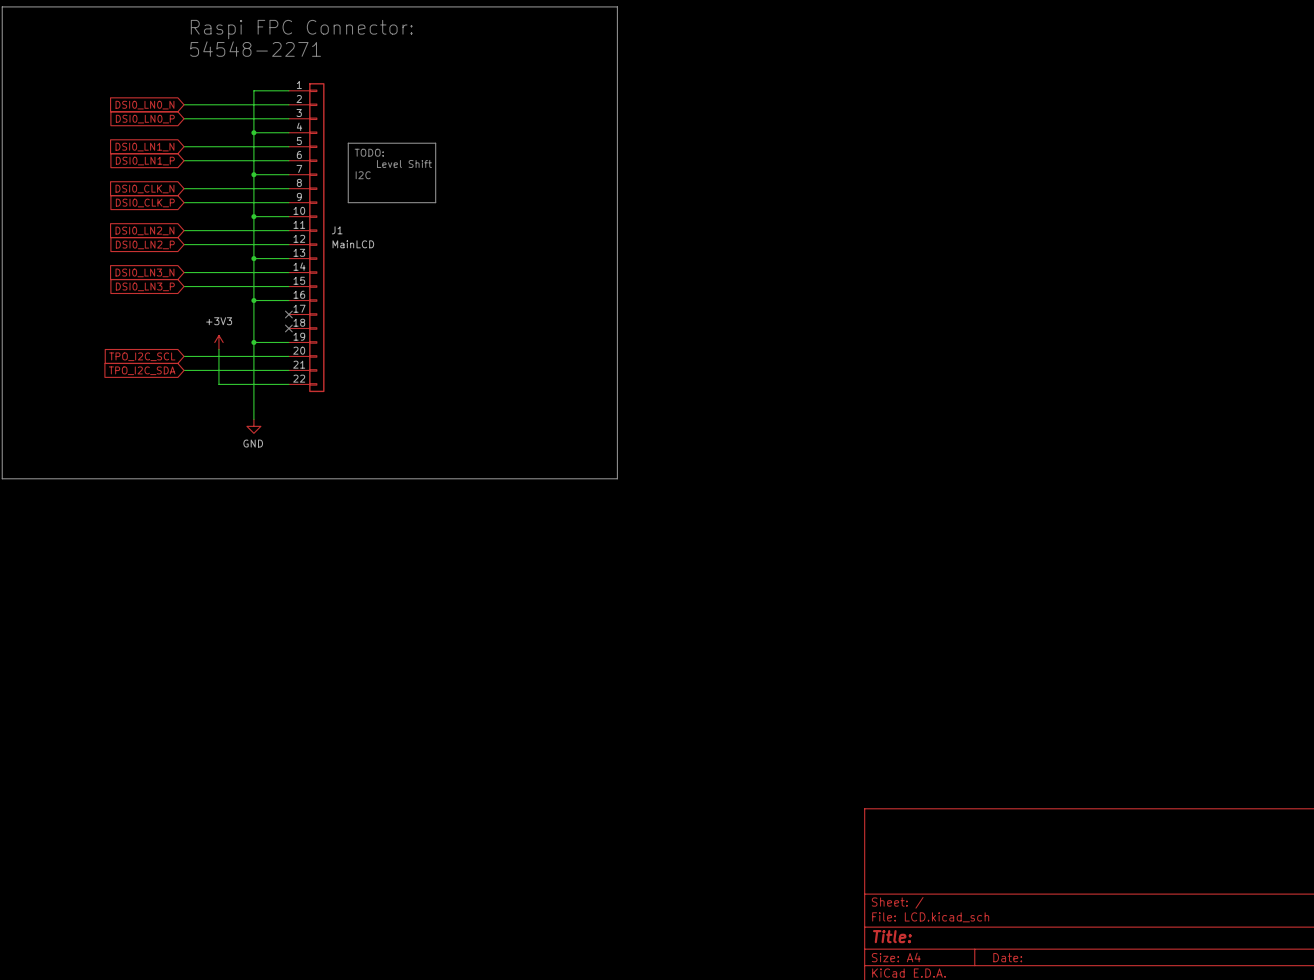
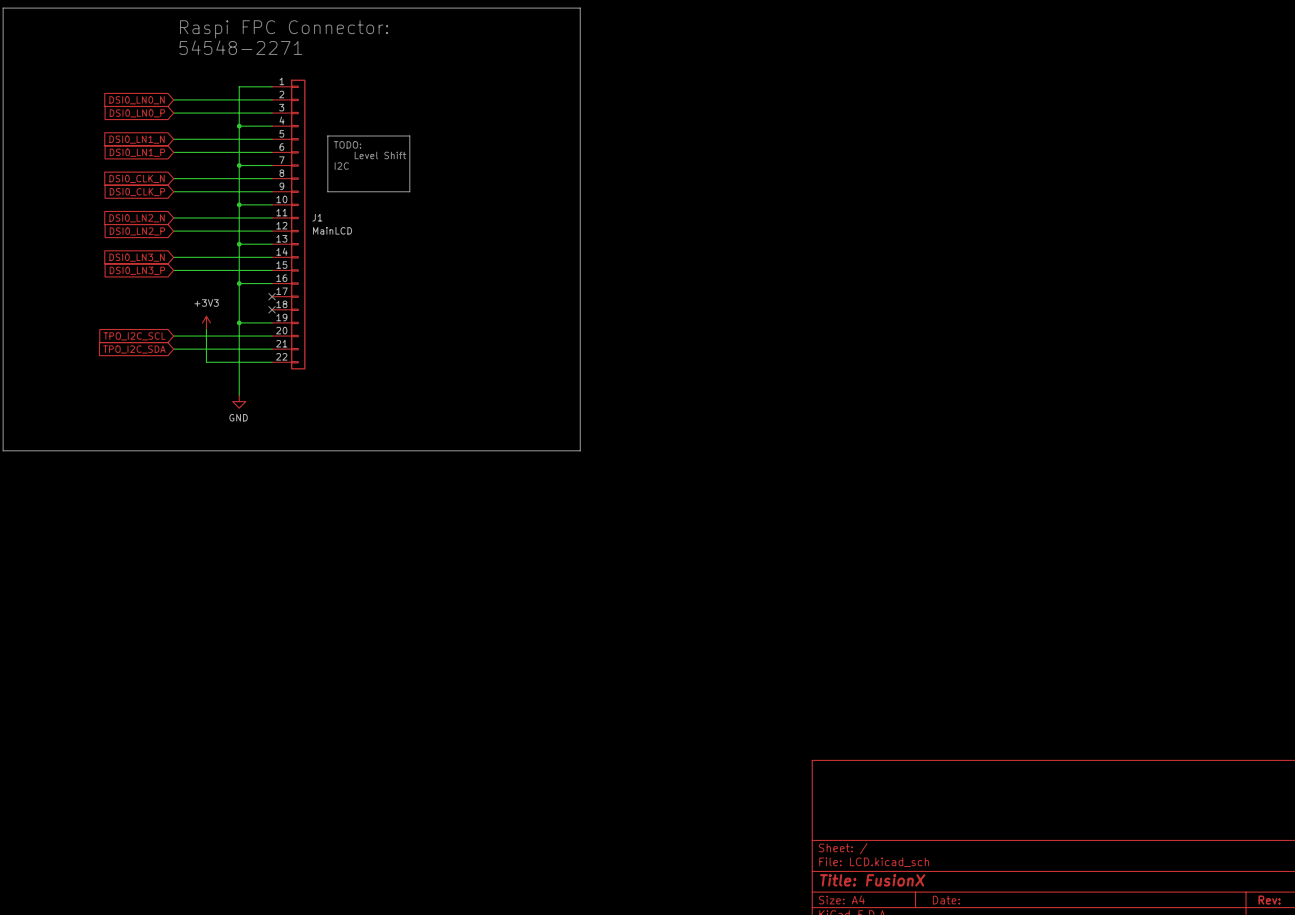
title block: Title: (892, 936) -> Title: FusionX (872, 880)

